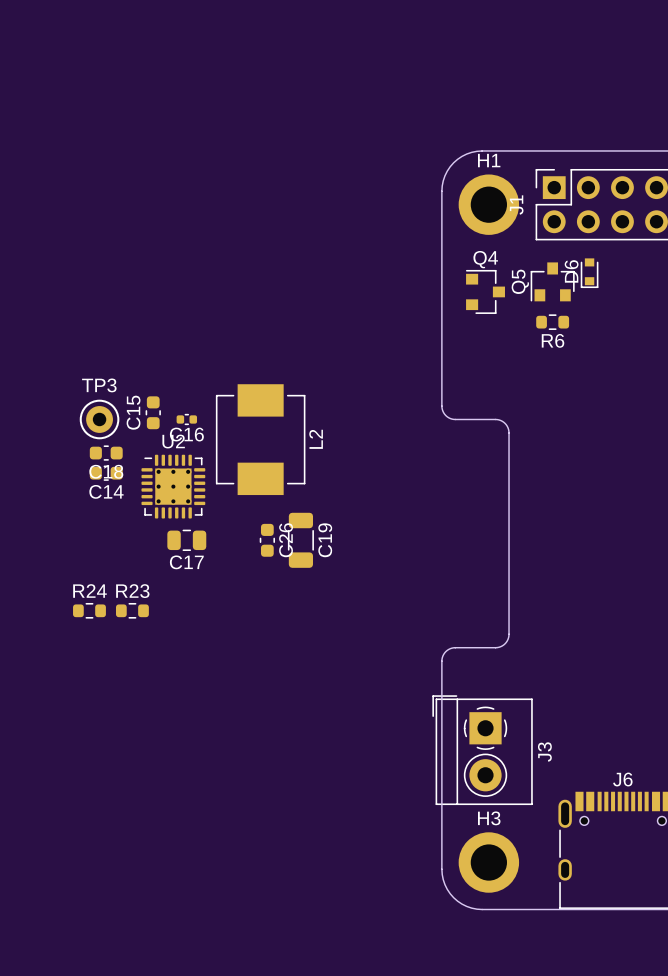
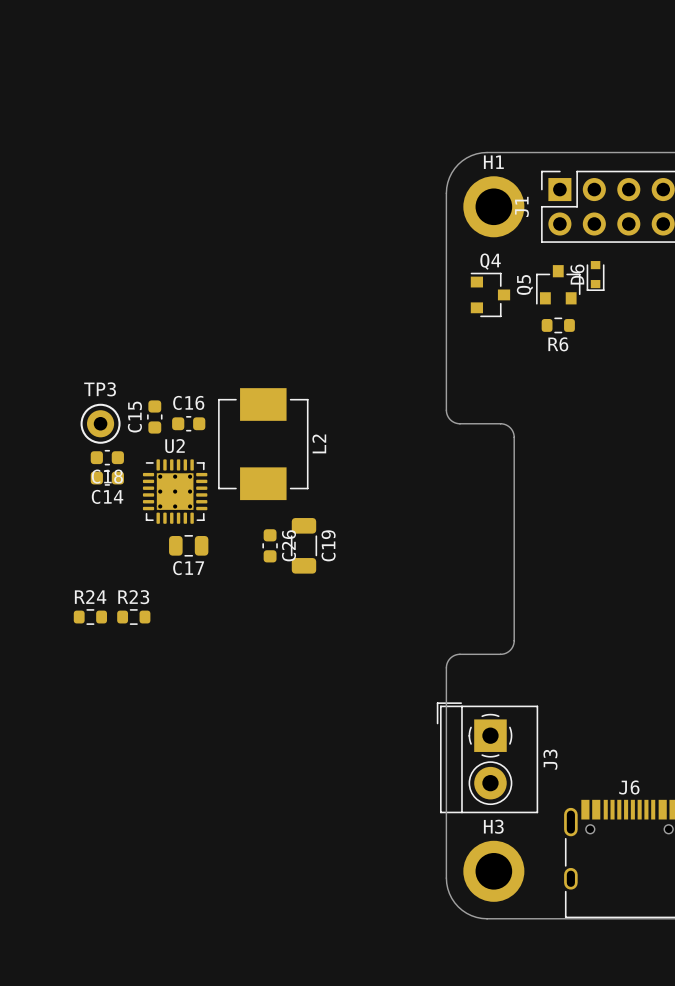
C16 footprint: [176, 413, 198, 426] -> [172, 416, 206, 432]
C16 name position: C16 (186, 434) -> C16 (188, 402)

